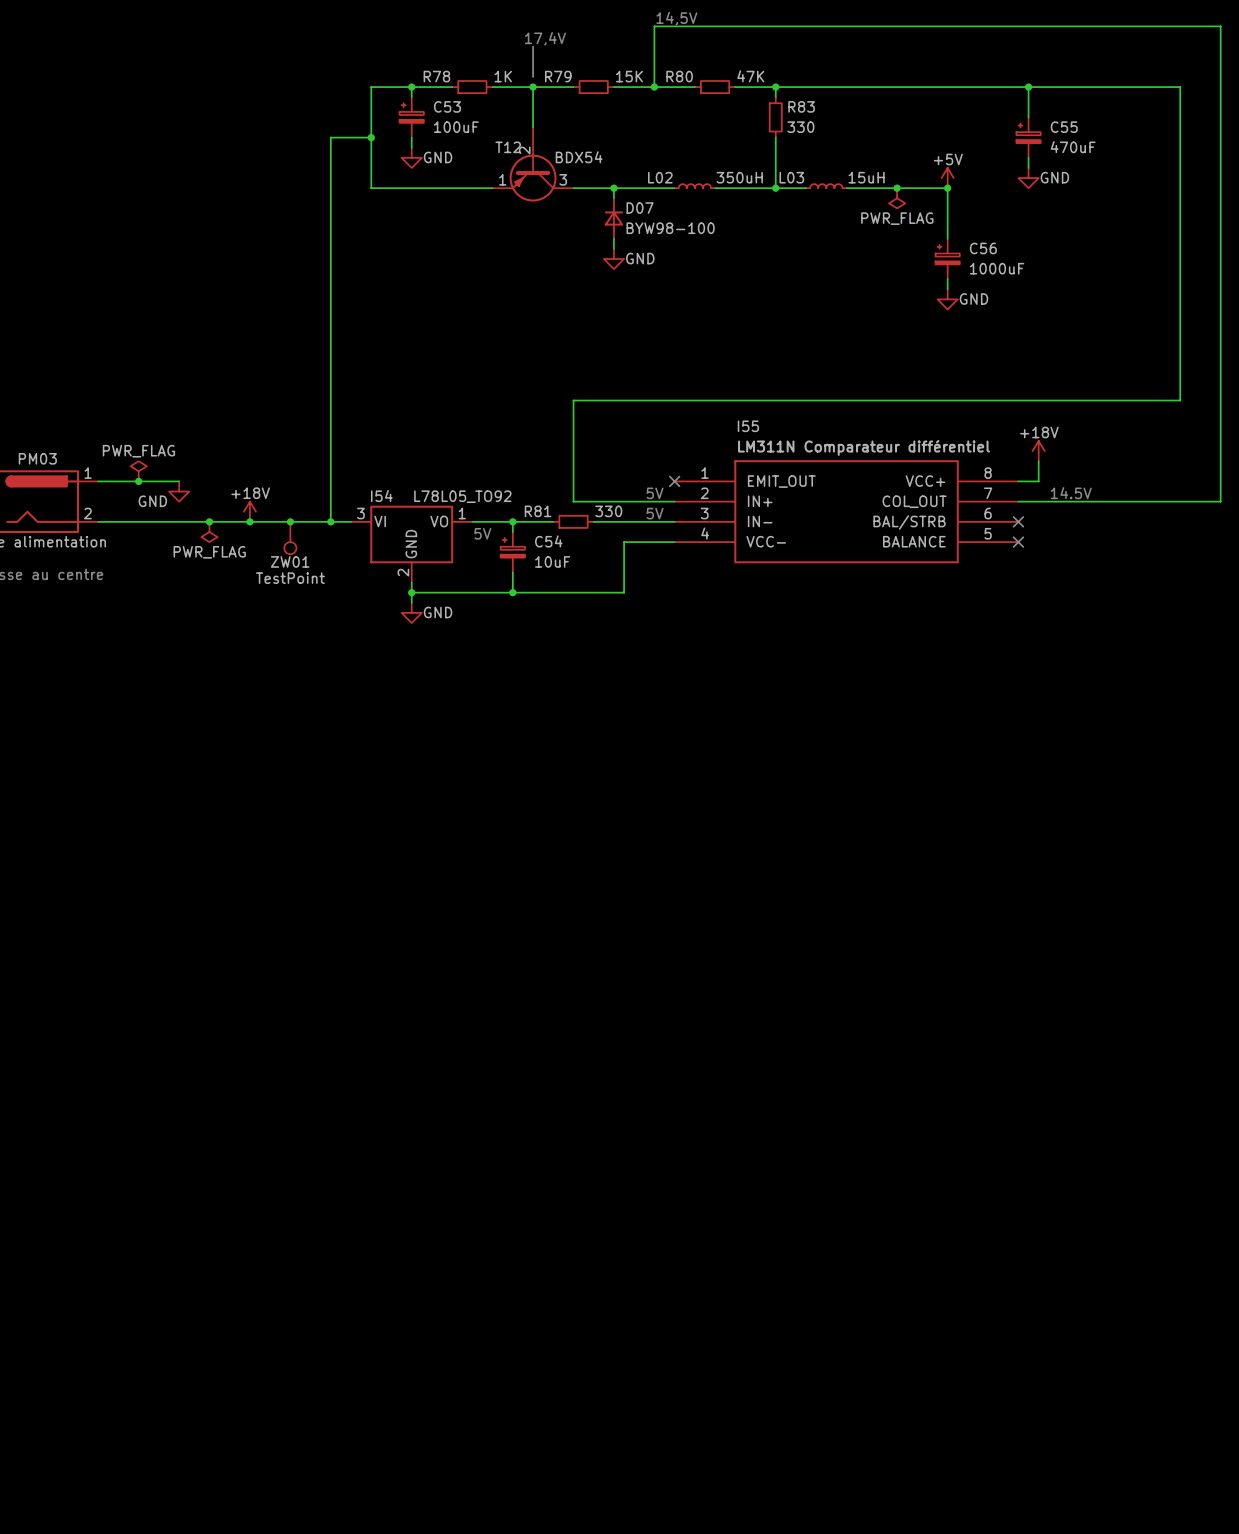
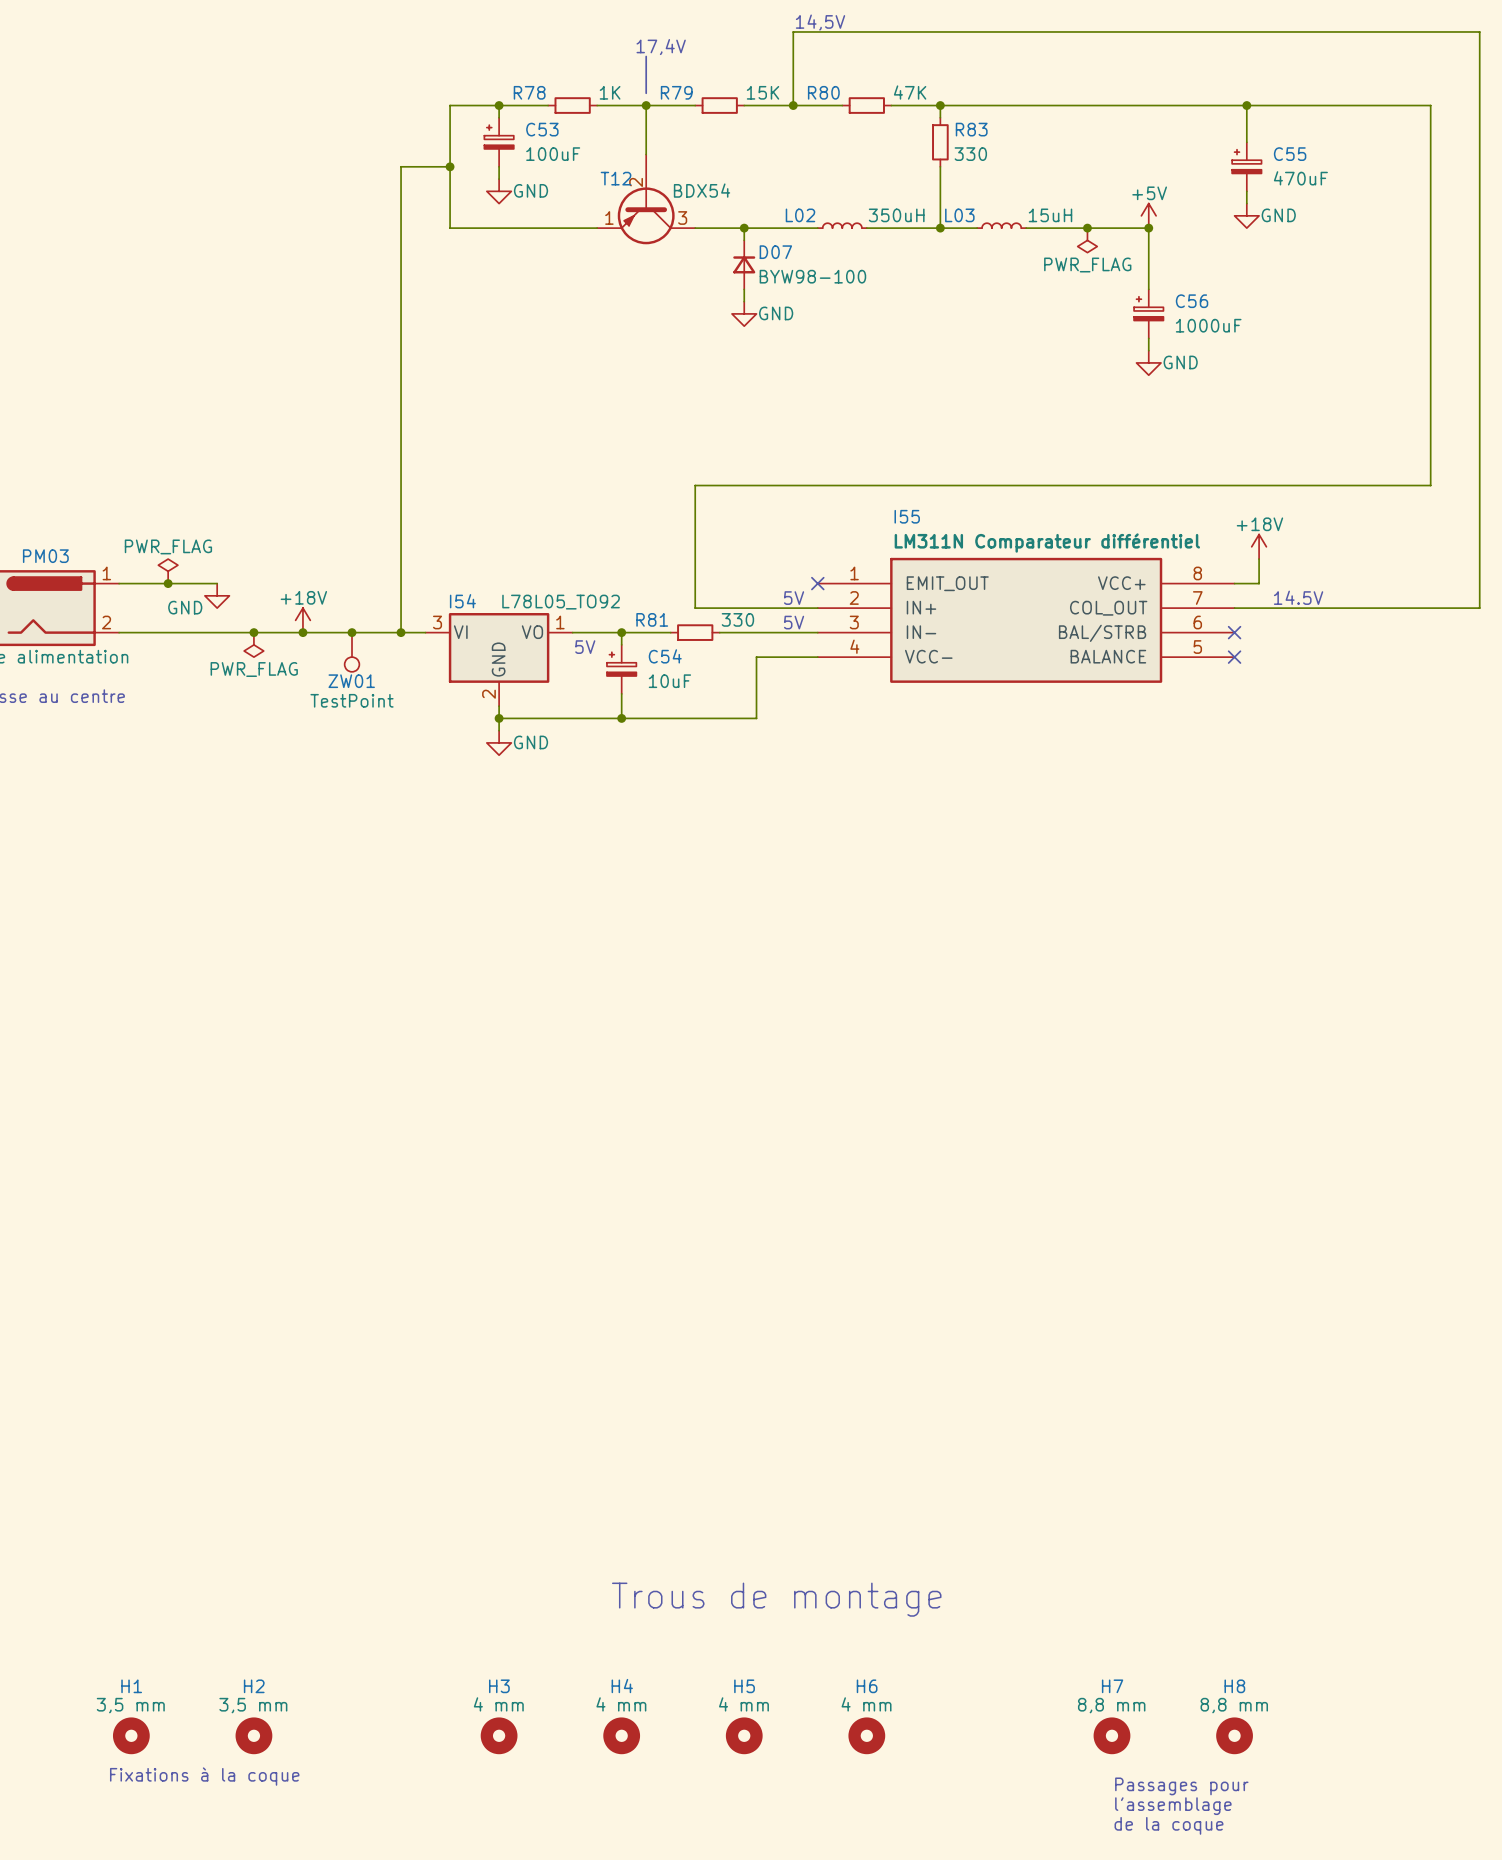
text: none -> Trous de montage (776, 1599)
H1: none -> 3,5 mm (131, 1735)
H2: none -> 3,5 mm (253, 1735)
H3: none -> 4 mm (499, 1735)
H4: none -> 4 mm (621, 1735)
H5: none -> 4 mm (744, 1735)
H6: none -> 4 mm (866, 1735)
H7: none -> 8,8 mm (1111, 1735)
H8: none -> 8,8 mm (1234, 1735)
text: none -> Fixations à la coque (204, 1776)
text: none -> Passages pour (1181, 1786)
text: none -> l'assemblage (1173, 1806)
text: none -> de la coque (1168, 1825)

